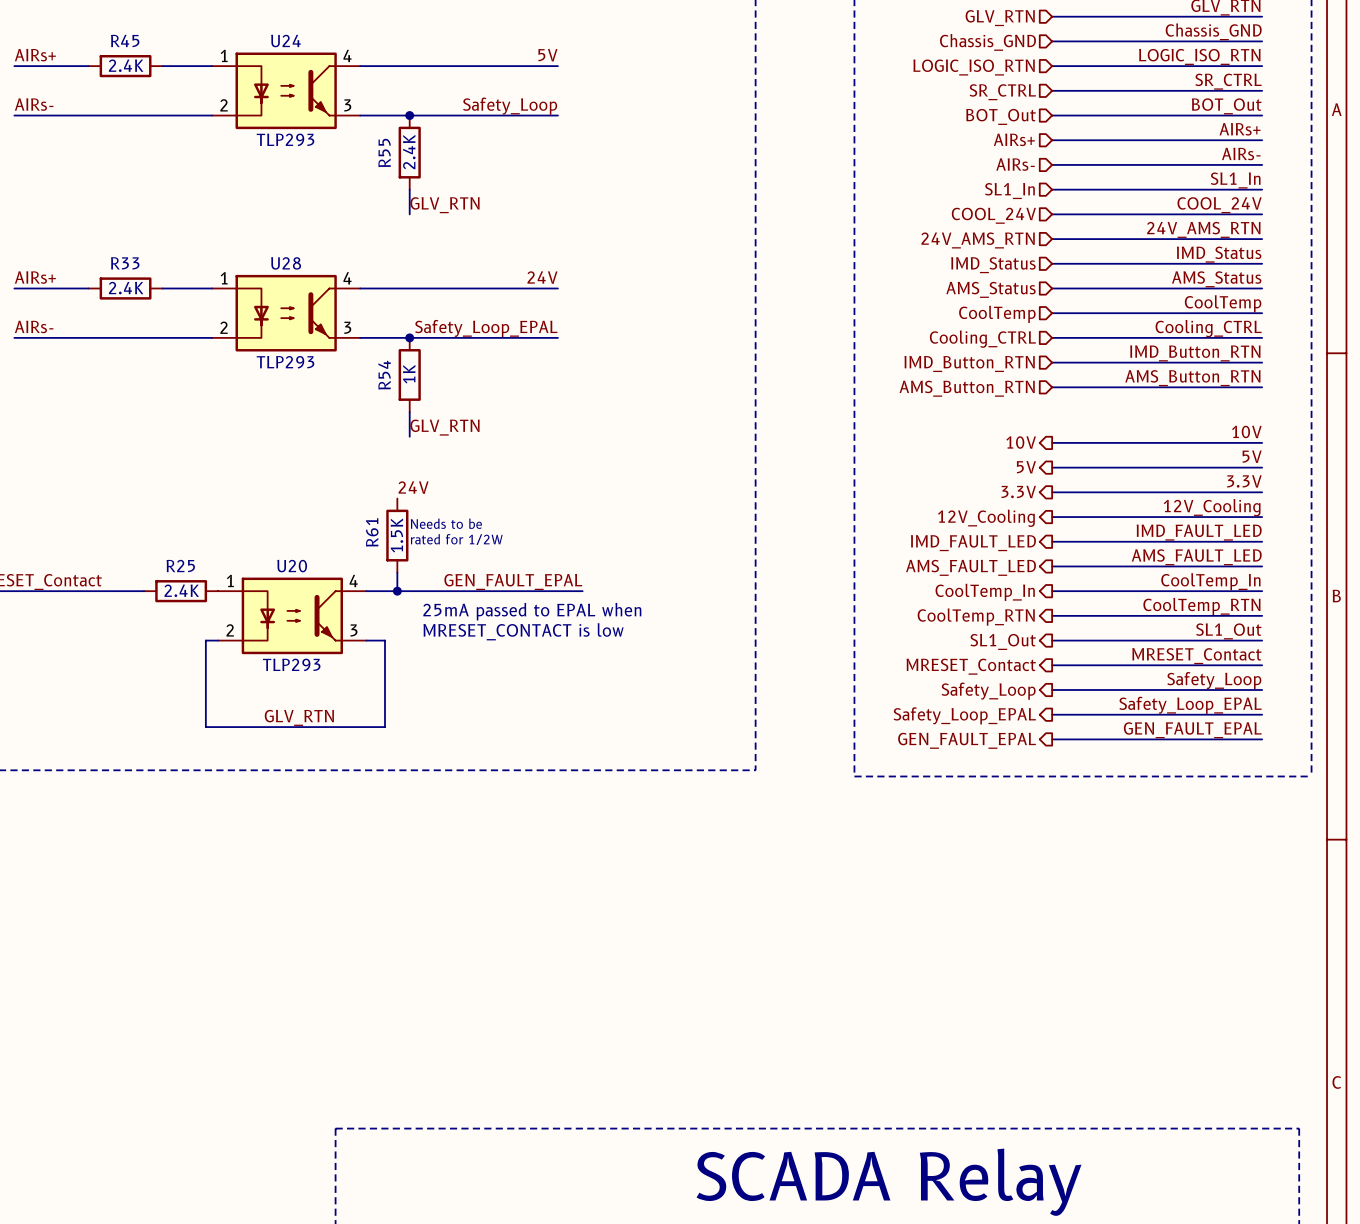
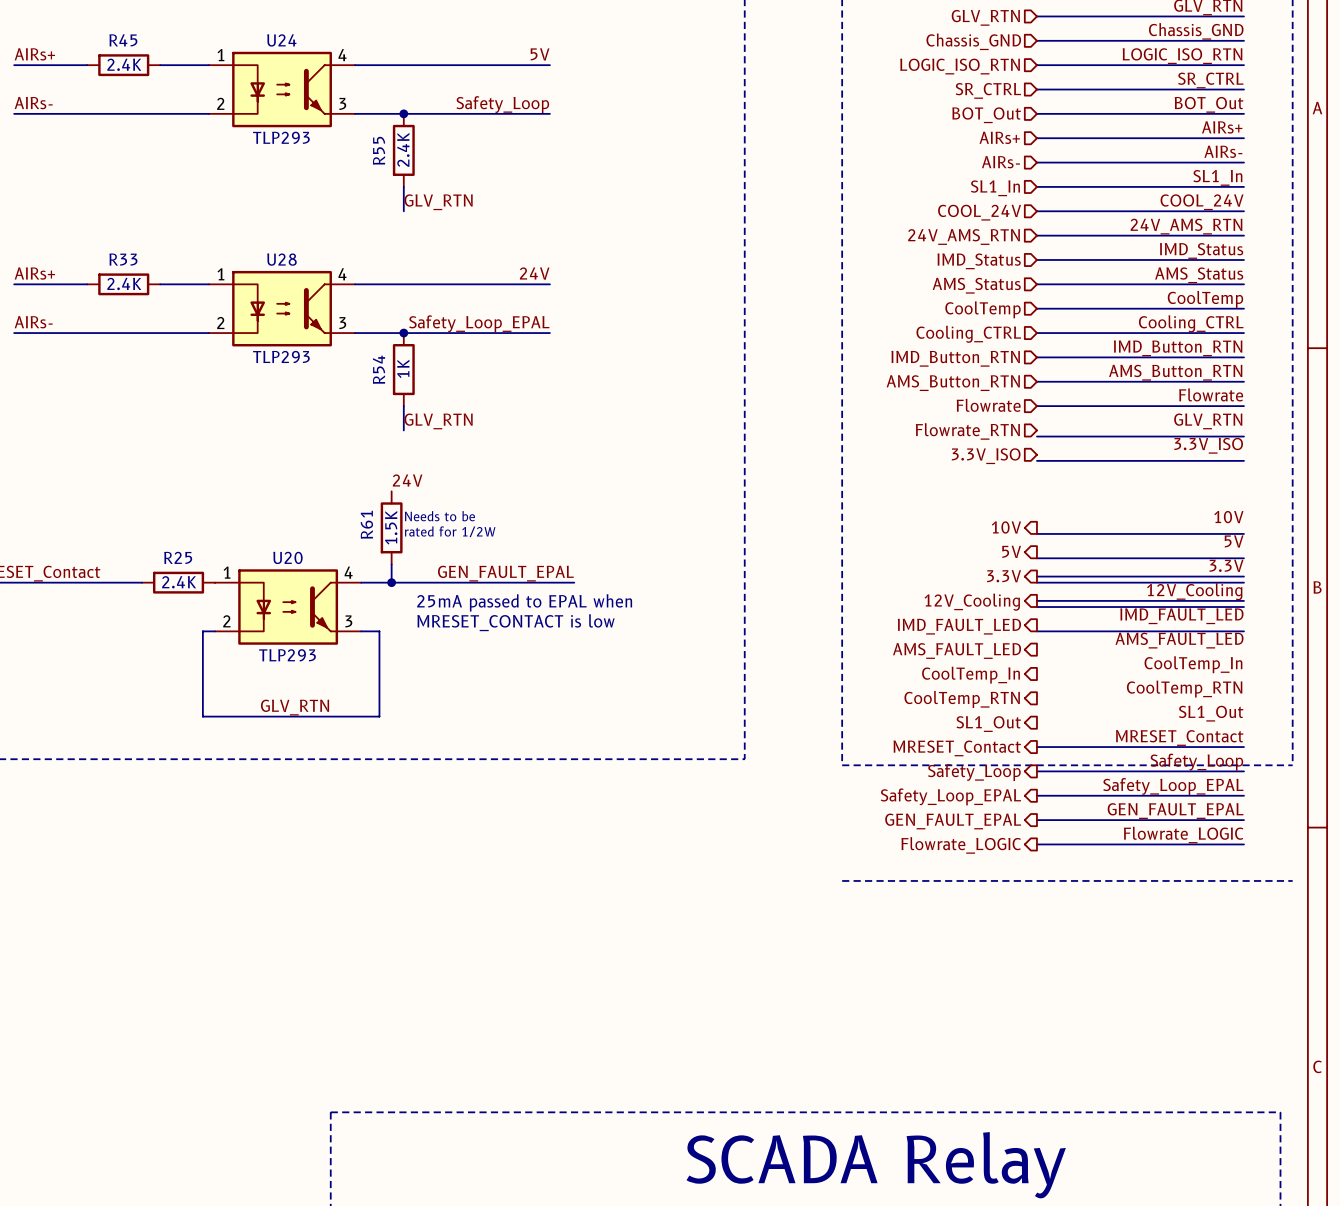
label: none -> Flowrate (1211, 394)
hierarchical label: none -> Flowrate (988, 405)
wire: none -> (1036, 406) (1243, 406)
label: none -> GLV_RTN (1208, 421)
label position: 10V (1246, 431) -> 10V (1228, 517)
hierarchical label: none -> Flowrate_RTN (967, 431)
hierarchical label position: 10V (1021, 442) -> 10V (1006, 527)
label: none -> 3.3V_ISO (1208, 445)
label position: 5V (1252, 456) -> 5V (1234, 541)
hierarchical label: none -> 3.3V_ISO (986, 456)
hierarchical label position: 5V (1026, 467) -> 5V (1011, 551)
label position: 3.3V (1244, 481) -> 3.3V (1226, 565)
hierarchical label position: 3.3V (1018, 491) -> 3.3V (1004, 576)
wire: (1052, 492) (1262, 492) -> (1036, 576) (1243, 576)
label position: 12V_Cooling (1212, 507) -> 12V_Cooling (1194, 591)
wire: (1052, 517) (1262, 517) -> (1036, 600) (1243, 600)
hierarchical label position: 12V_Cooling (986, 518) -> 12V_Cooling (972, 602)
label position: IMD_FAULT_LED (1199, 532) -> IMD_FAULT_LED (1181, 616)
hierarchical label position: IMD_FAULT_LED (973, 543) -> IMD_FAULT_LED (959, 626)
label position: AMS_FAULT_LED (1196, 557) -> AMS_FAULT_LED (1179, 640)
hierarchical label position: AMS_FAULT_LED (971, 567) -> AMS_FAULT_LED (957, 651)
label position: CoolTemp_In (1210, 581) -> CoolTemp_In (1193, 664)
hierarchical label position: CoolTemp_In (985, 592) -> CoolTemp_In (971, 675)
label position: CoolTemp_RTN (1201, 606) -> CoolTemp_RTN (1184, 689)
hierarchical label position: CoolTemp_RTN (976, 617) -> CoolTemp_RTN (962, 699)
label position: SL1_Out (1228, 631) -> SL1_Out (1211, 713)
hierarchical label position: SL1_Out (1003, 641) -> SL1_Out (988, 724)
label position: MRESET_Contact (1196, 656) -> MRESET_Contact (1179, 738)
wire: (1052, 665) (1262, 665) -> (1036, 747) (1243, 747)
hierarchical label position: MRESET_Contact (971, 666) -> MRESET_Contact (957, 748)
label position: Safety_Loop (1214, 680) -> Safety_Loop (1196, 762)
wire: (1052, 690) (1262, 690) -> (1036, 771) (1243, 771)
hierarchical label position: Safety_Loop (988, 691) -> Safety_Loop (974, 772)
label position: Safety_Loop_EPAL (1190, 705) -> Safety_Loop_EPAL (1173, 786)
wire: (1052, 714) (1262, 714) -> (1036, 795) (1243, 795)
hierarchical label position: Safety_Loop_EPAL (964, 715) -> Safety_Loop_EPAL (950, 796)
label position: GEN_FAULT_EPAL (1192, 730) -> GEN_FAULT_EPAL (1175, 811)
wire: (1052, 739) (1262, 739) -> (1036, 820) (1243, 820)
hierarchical label position: GEN_FAULT_EPAL (967, 740) -> GEN_FAULT_EPAL (953, 821)
label: none -> Flowrate_LOGIC (1183, 835)
wire: none -> (1036, 844) (1243, 844)
hierarchical label: none -> Flowrate_LOGIC (961, 845)
line: none -> (842, 880) (1292, 880)

